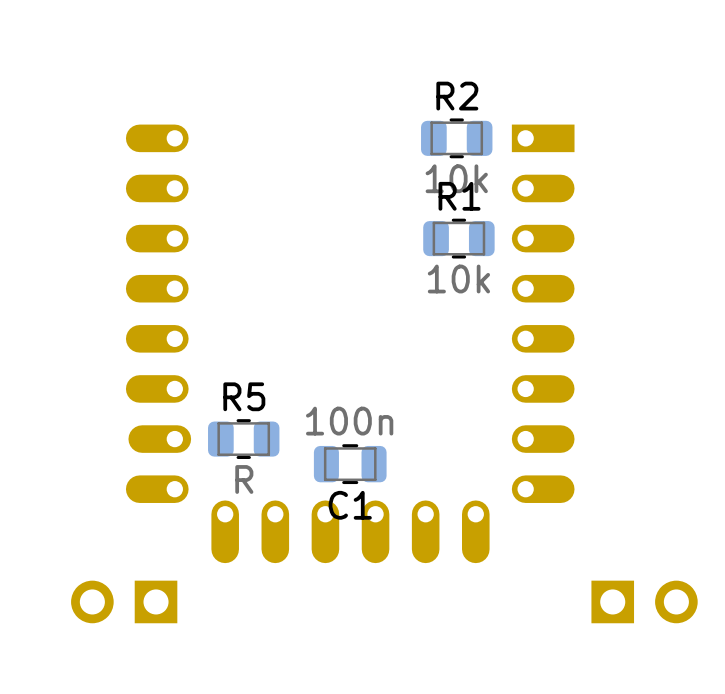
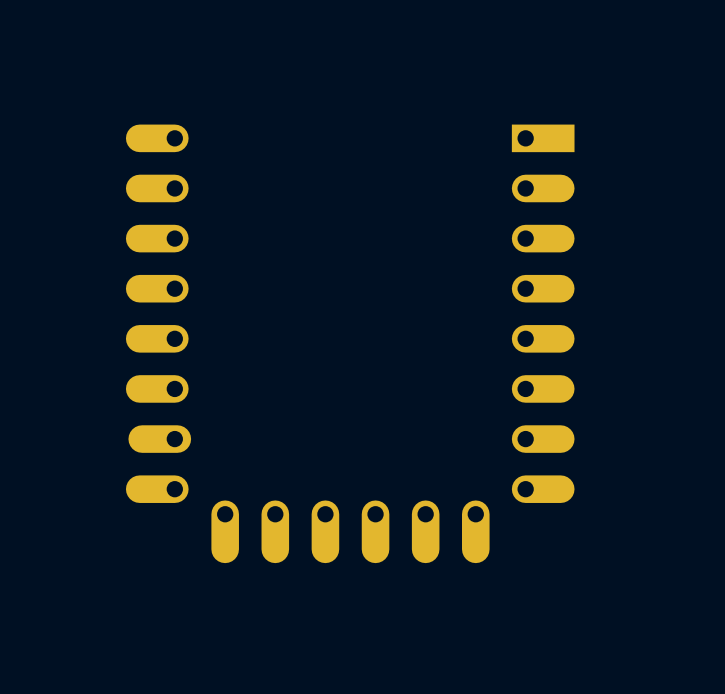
R2: 10k (456, 138) -> none
R1: 10k (458, 238) -> none
R5: R (243, 439) -> none
C1: 100n (350, 464) -> none
part: (124, 601) -> none
part: (644, 601) -> none

